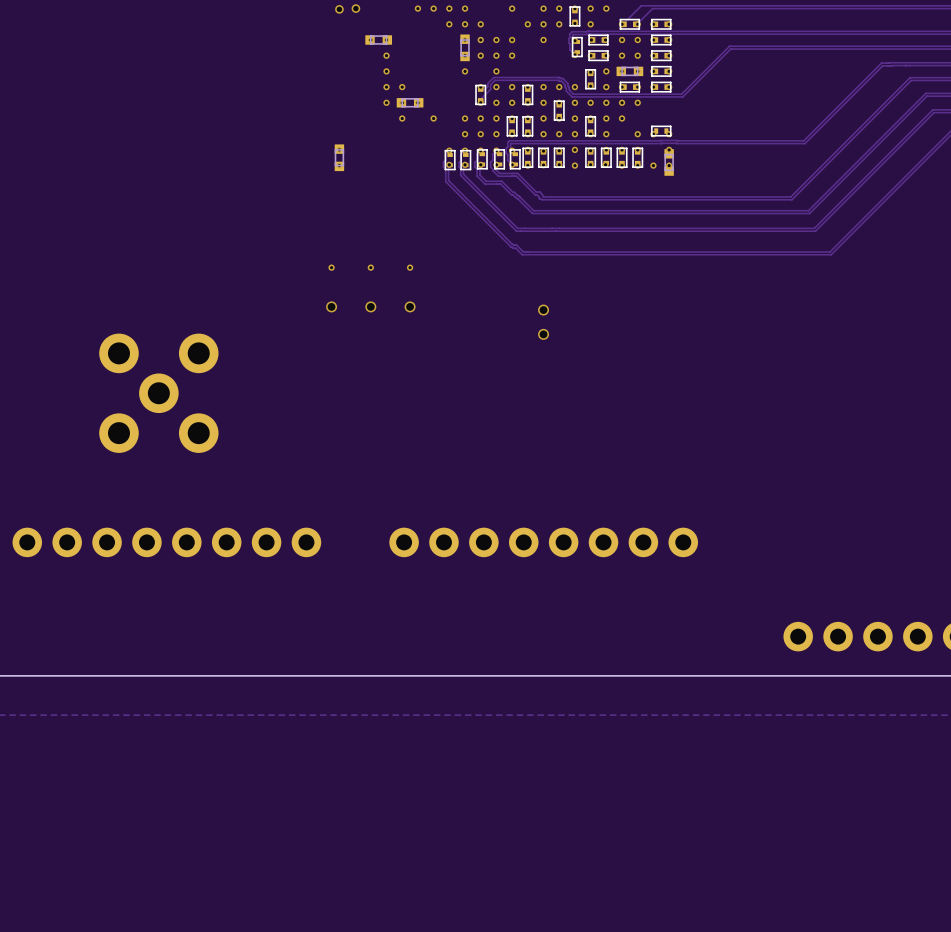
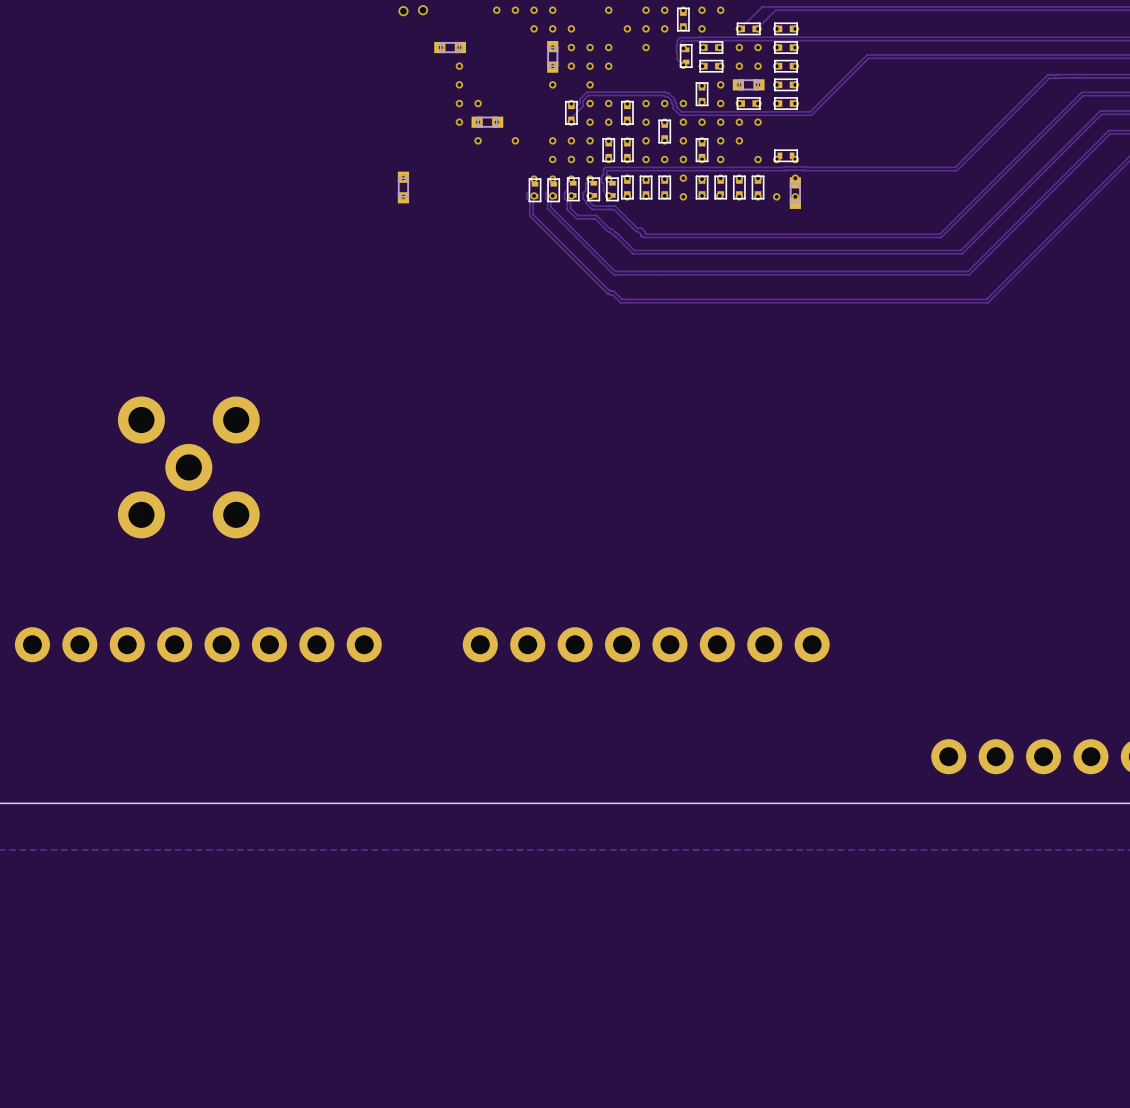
via: (331, 267) -> none
via: (370, 267) -> none
via: (410, 267) -> none
via: (331, 306) -> none
via: (370, 306) -> none
via: (410, 306) -> none
via: (543, 310) -> none
via: (543, 334) -> none

